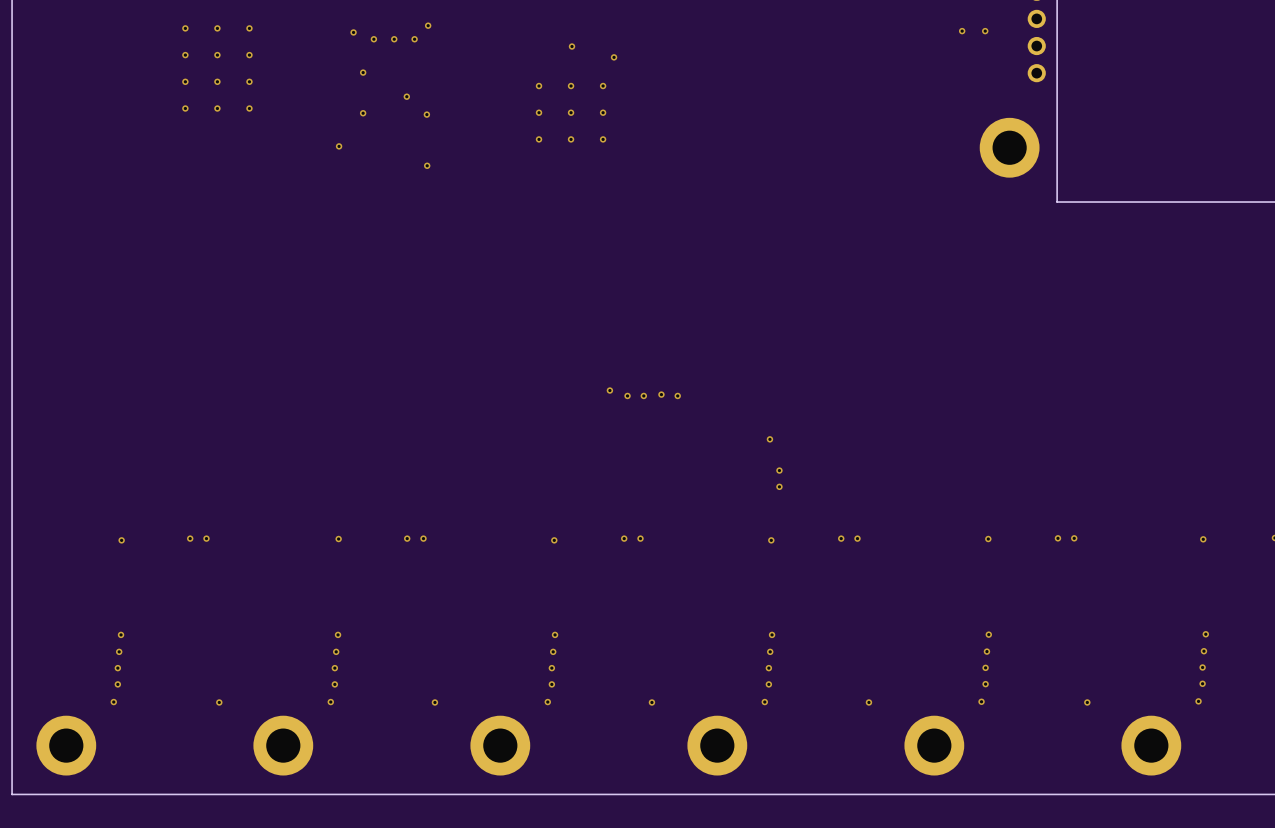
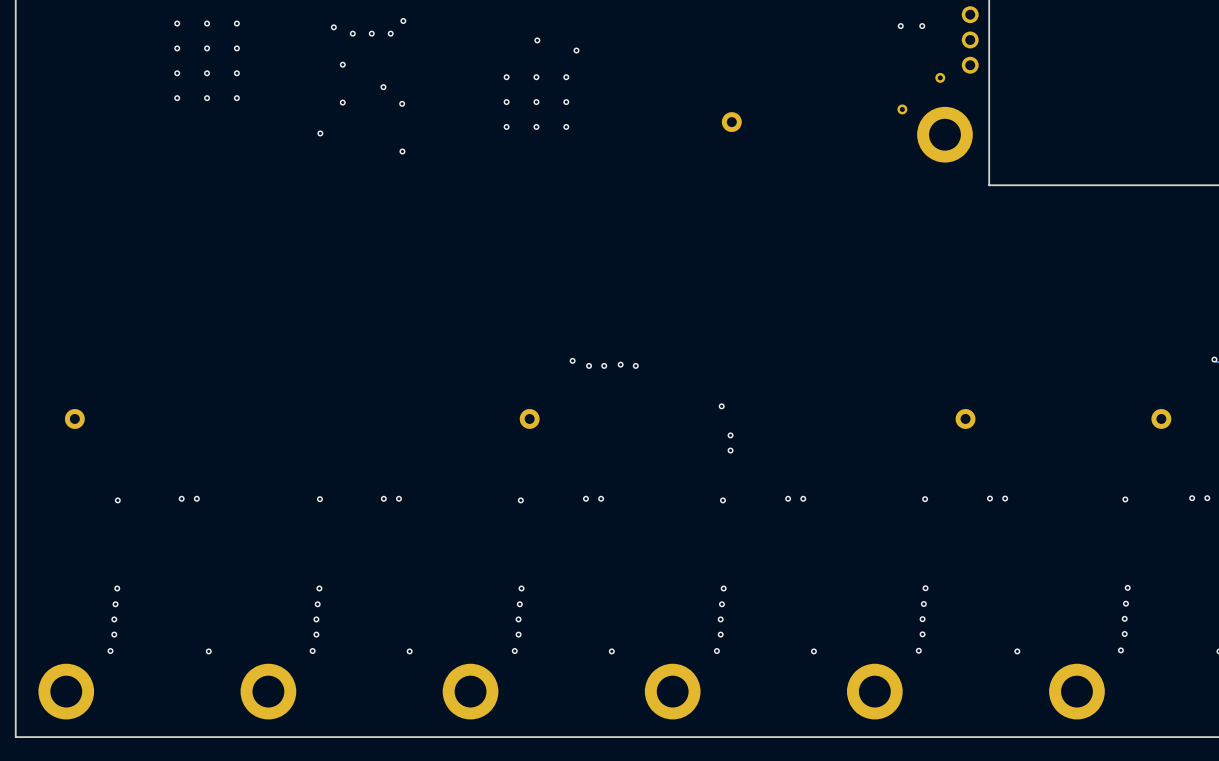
part: none -> (940, 77)
part: none -> (902, 109)
part: none -> (731, 122)
part: none -> (74, 418)
part: none -> (529, 418)
part: none -> (965, 418)
part: none -> (1161, 418)

